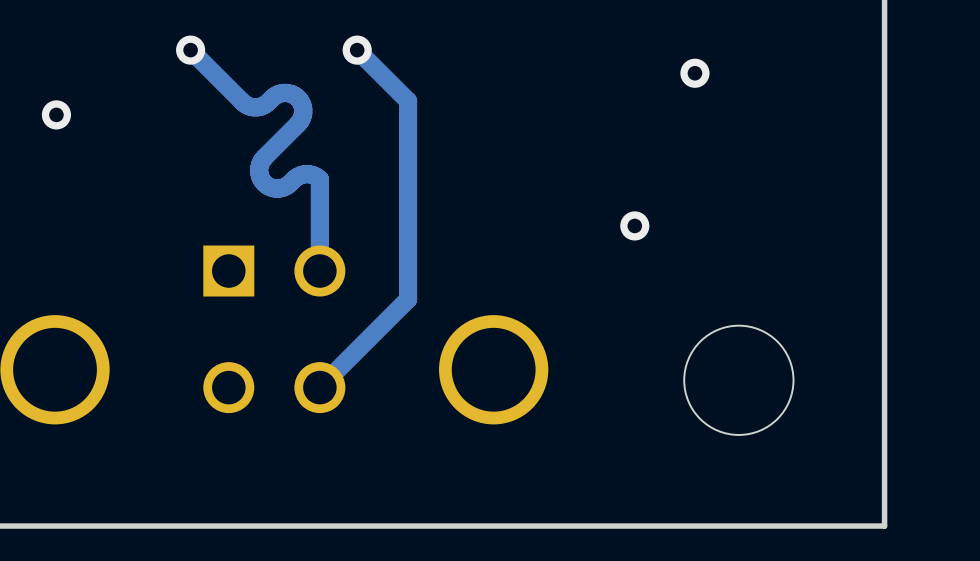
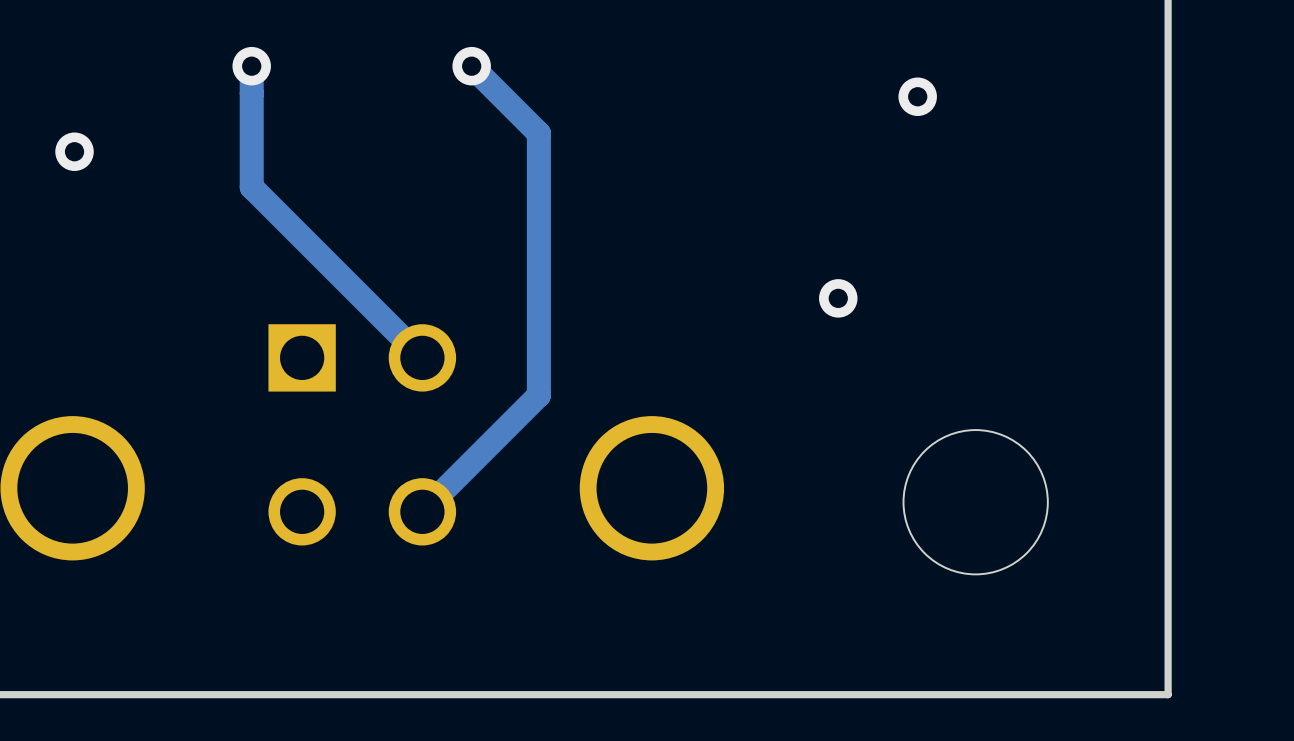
track: (190, 50) (242, 102) (249, 106) (261, 106) (275, 95) (283, 92) (291, 93) (300, 101) (303, 109) (300, 120) (264, 157) (260, 164) (259, 172) (264, 183) (275, 188) (287, 185) (297, 176) (304, 174) (313, 175) (319, 179) (319, 271) -> (251, 66) (251, 187) (422, 357)

